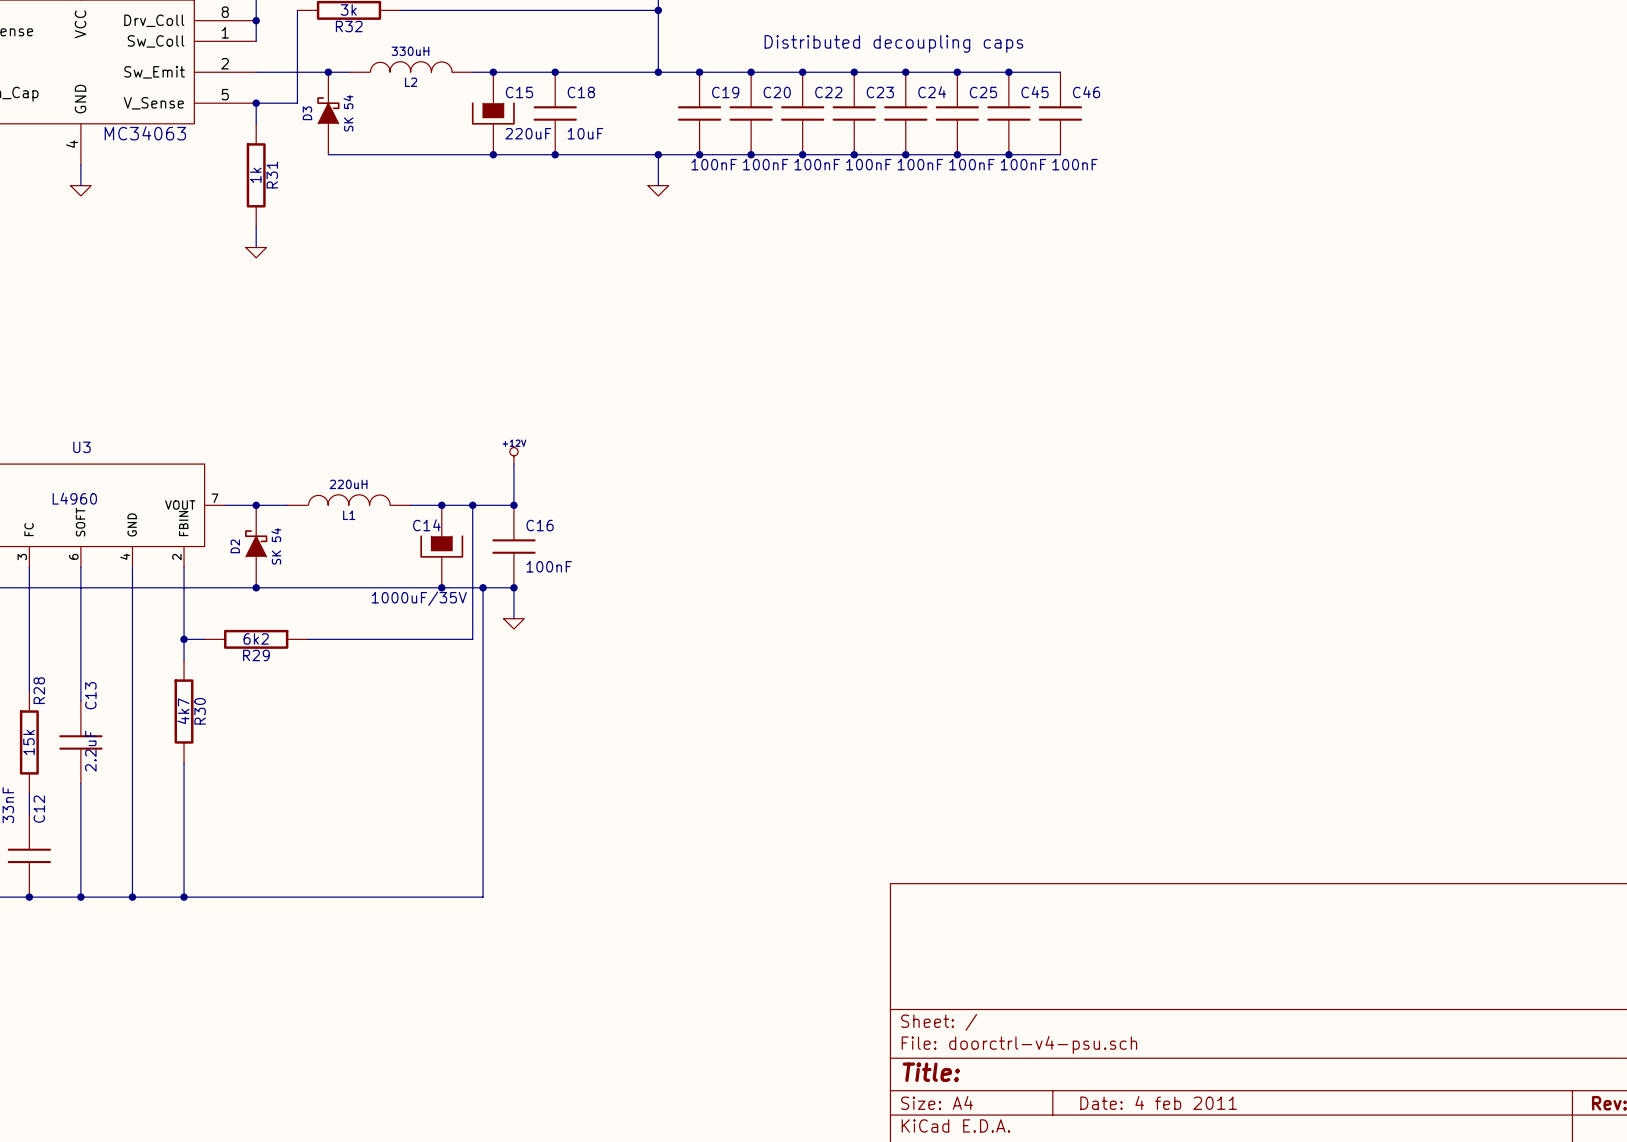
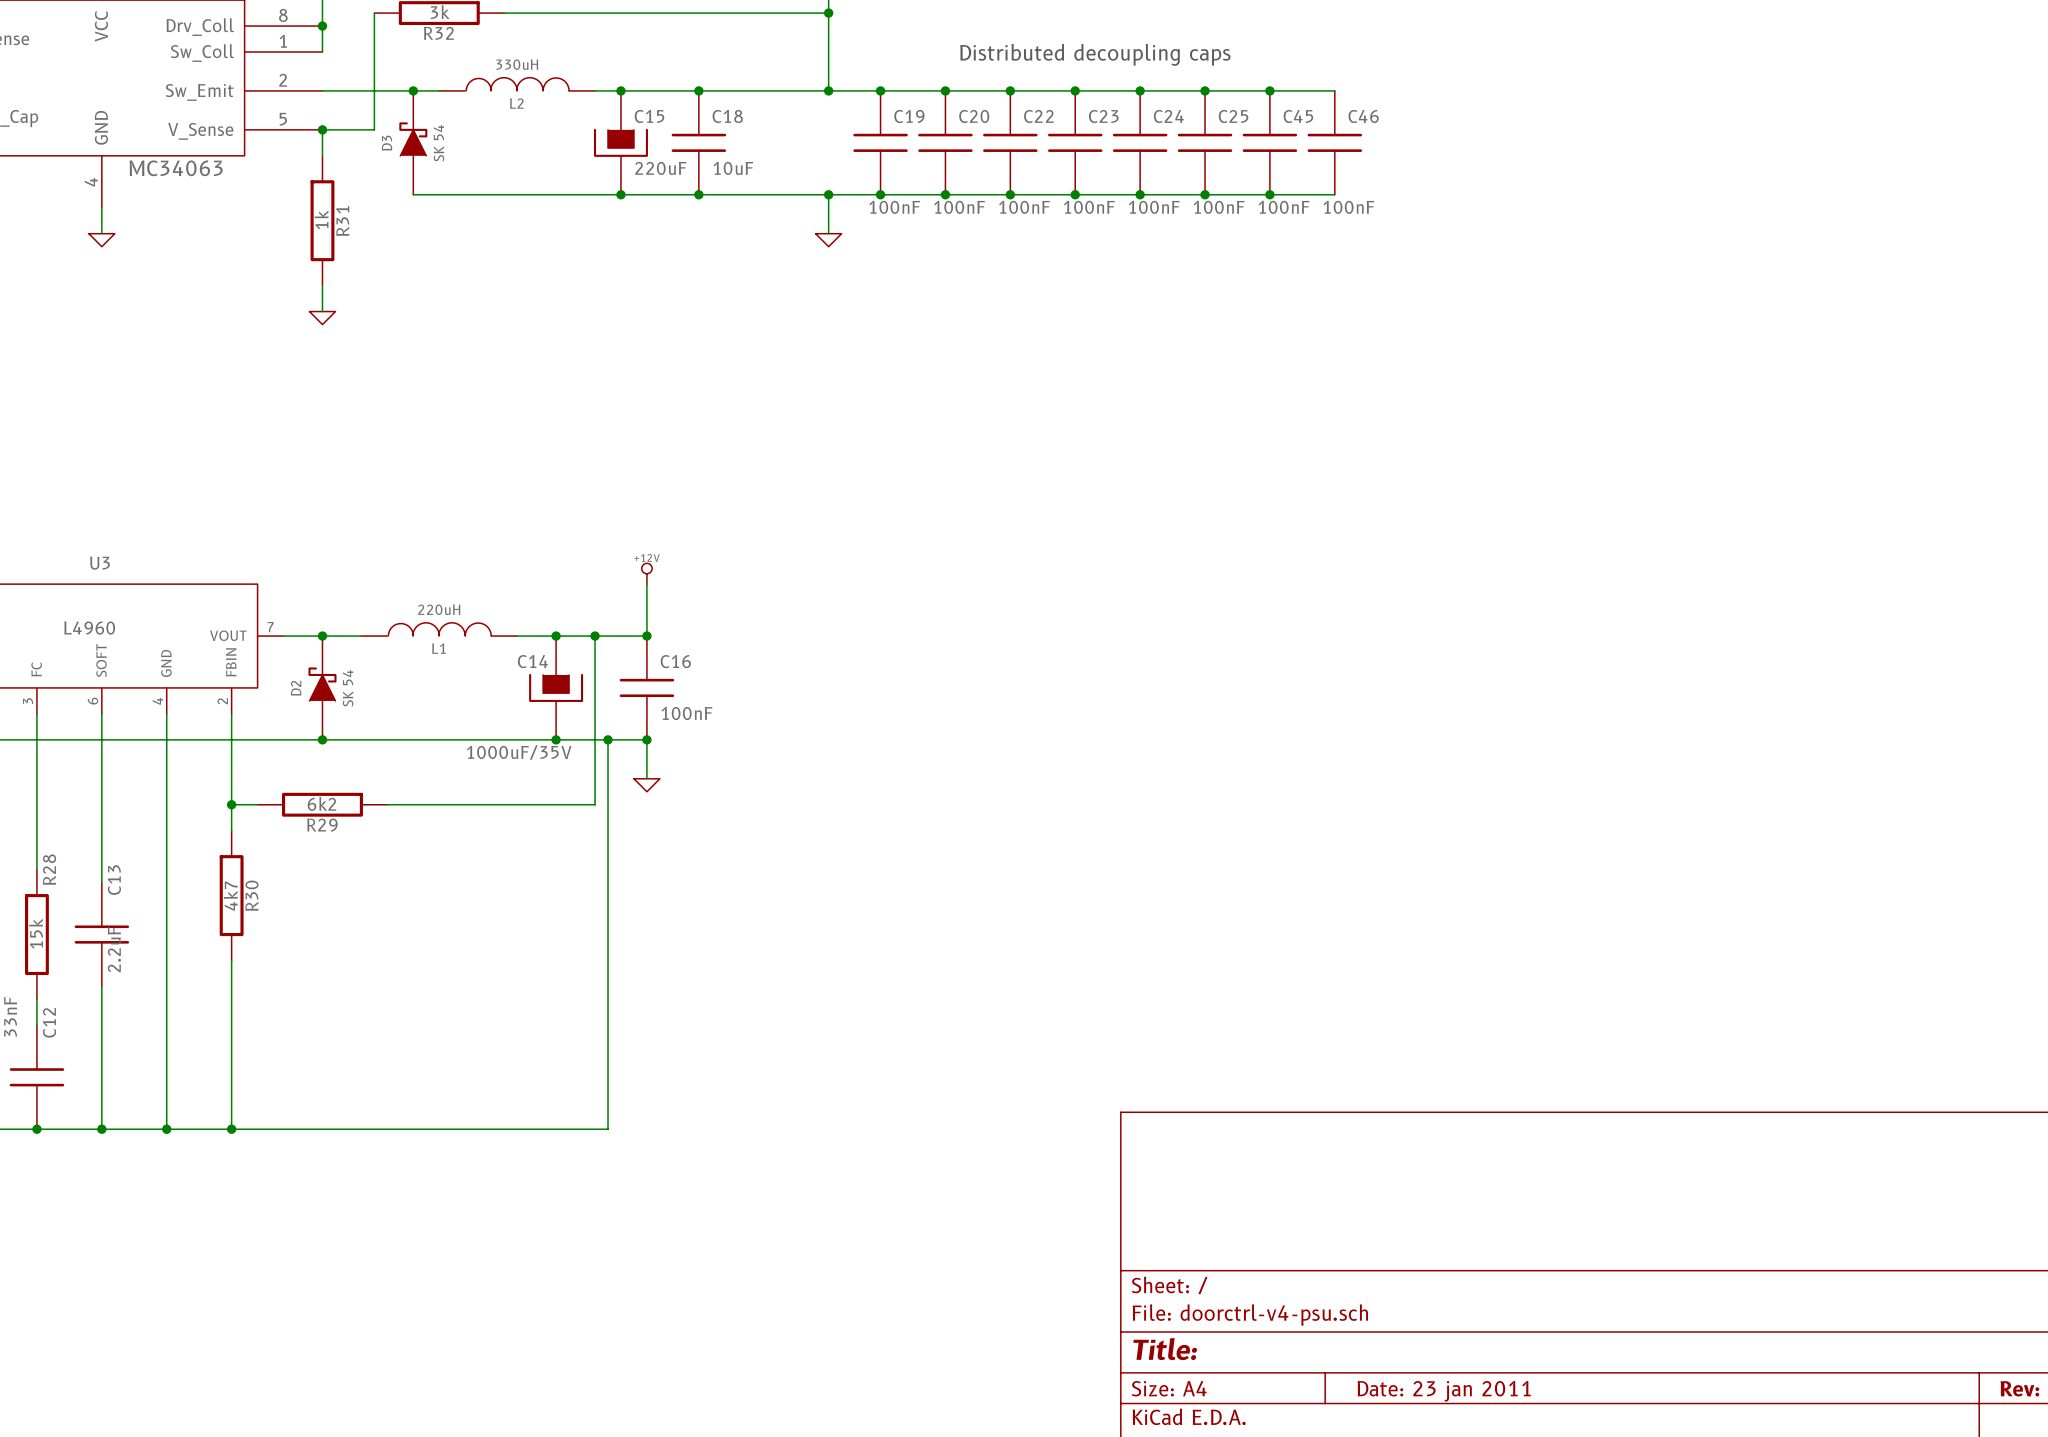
title block: Date: 4 feb 2011 (1158, 1102) -> Date: 23 jan 2011 (1444, 1391)

